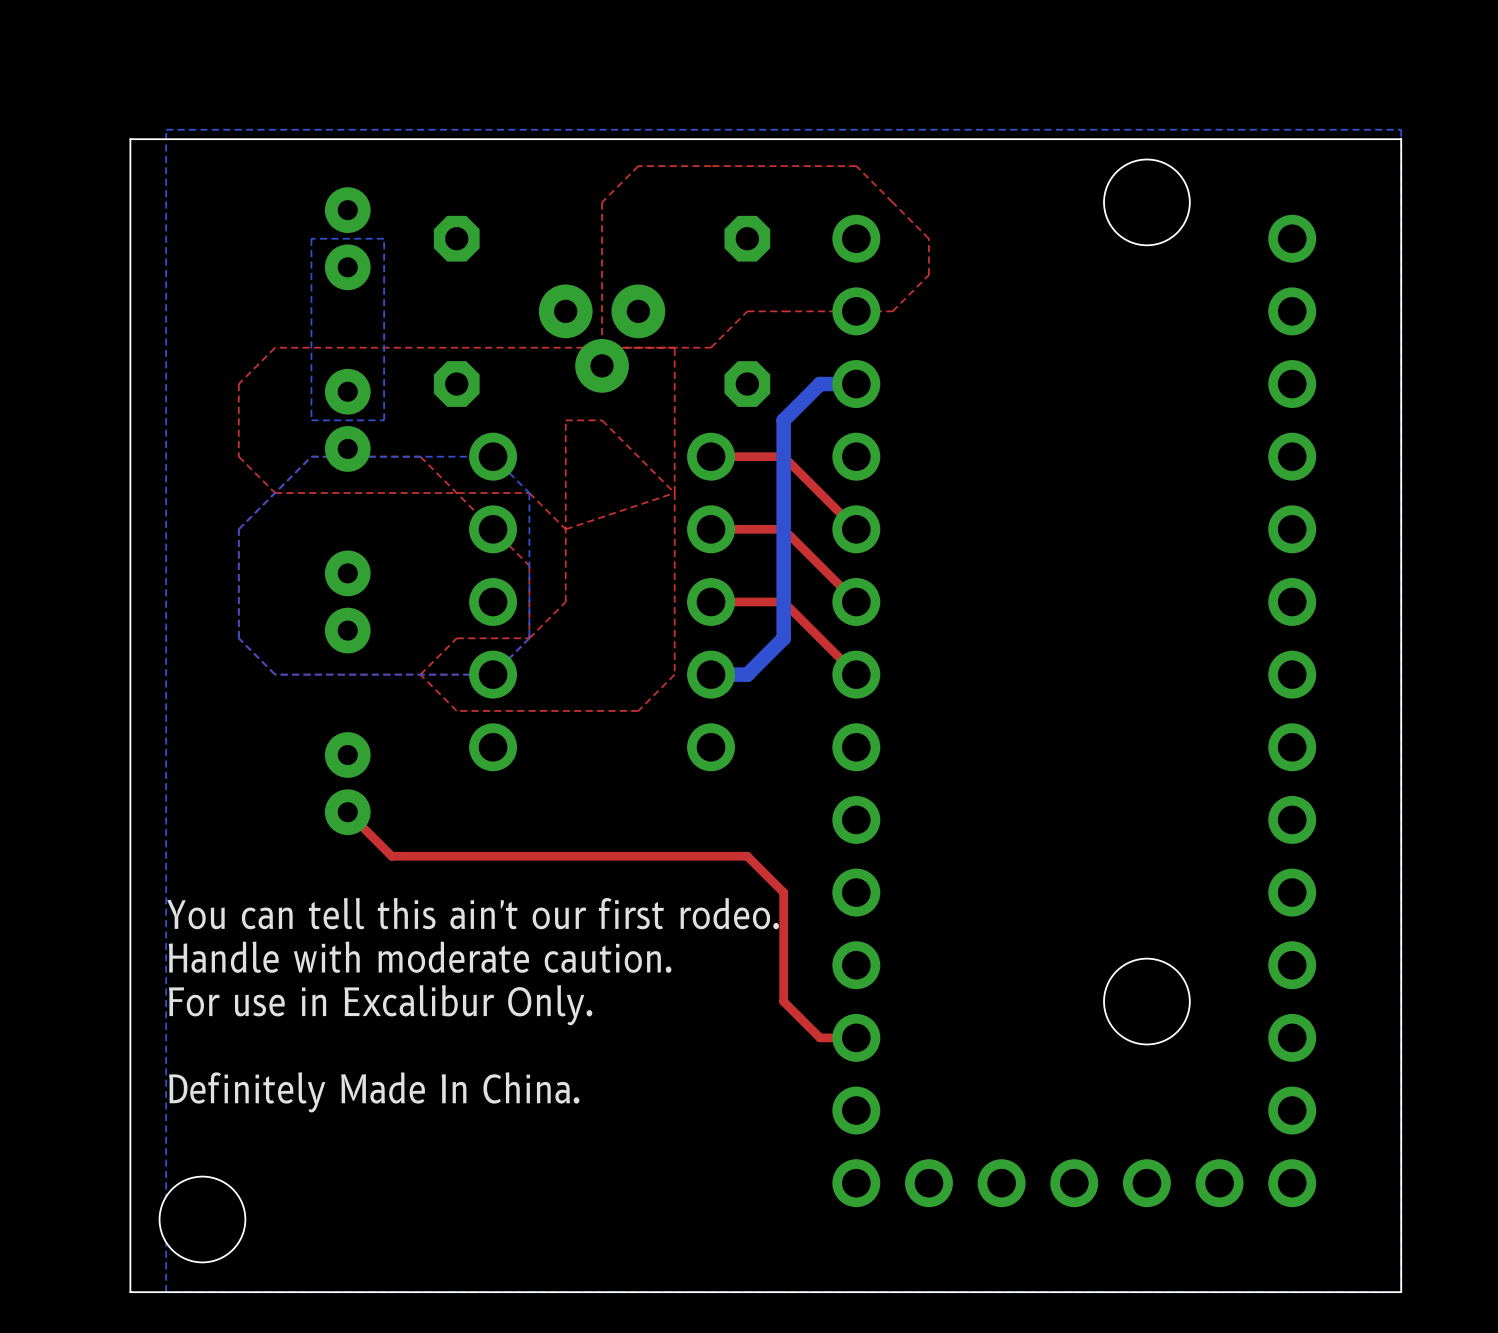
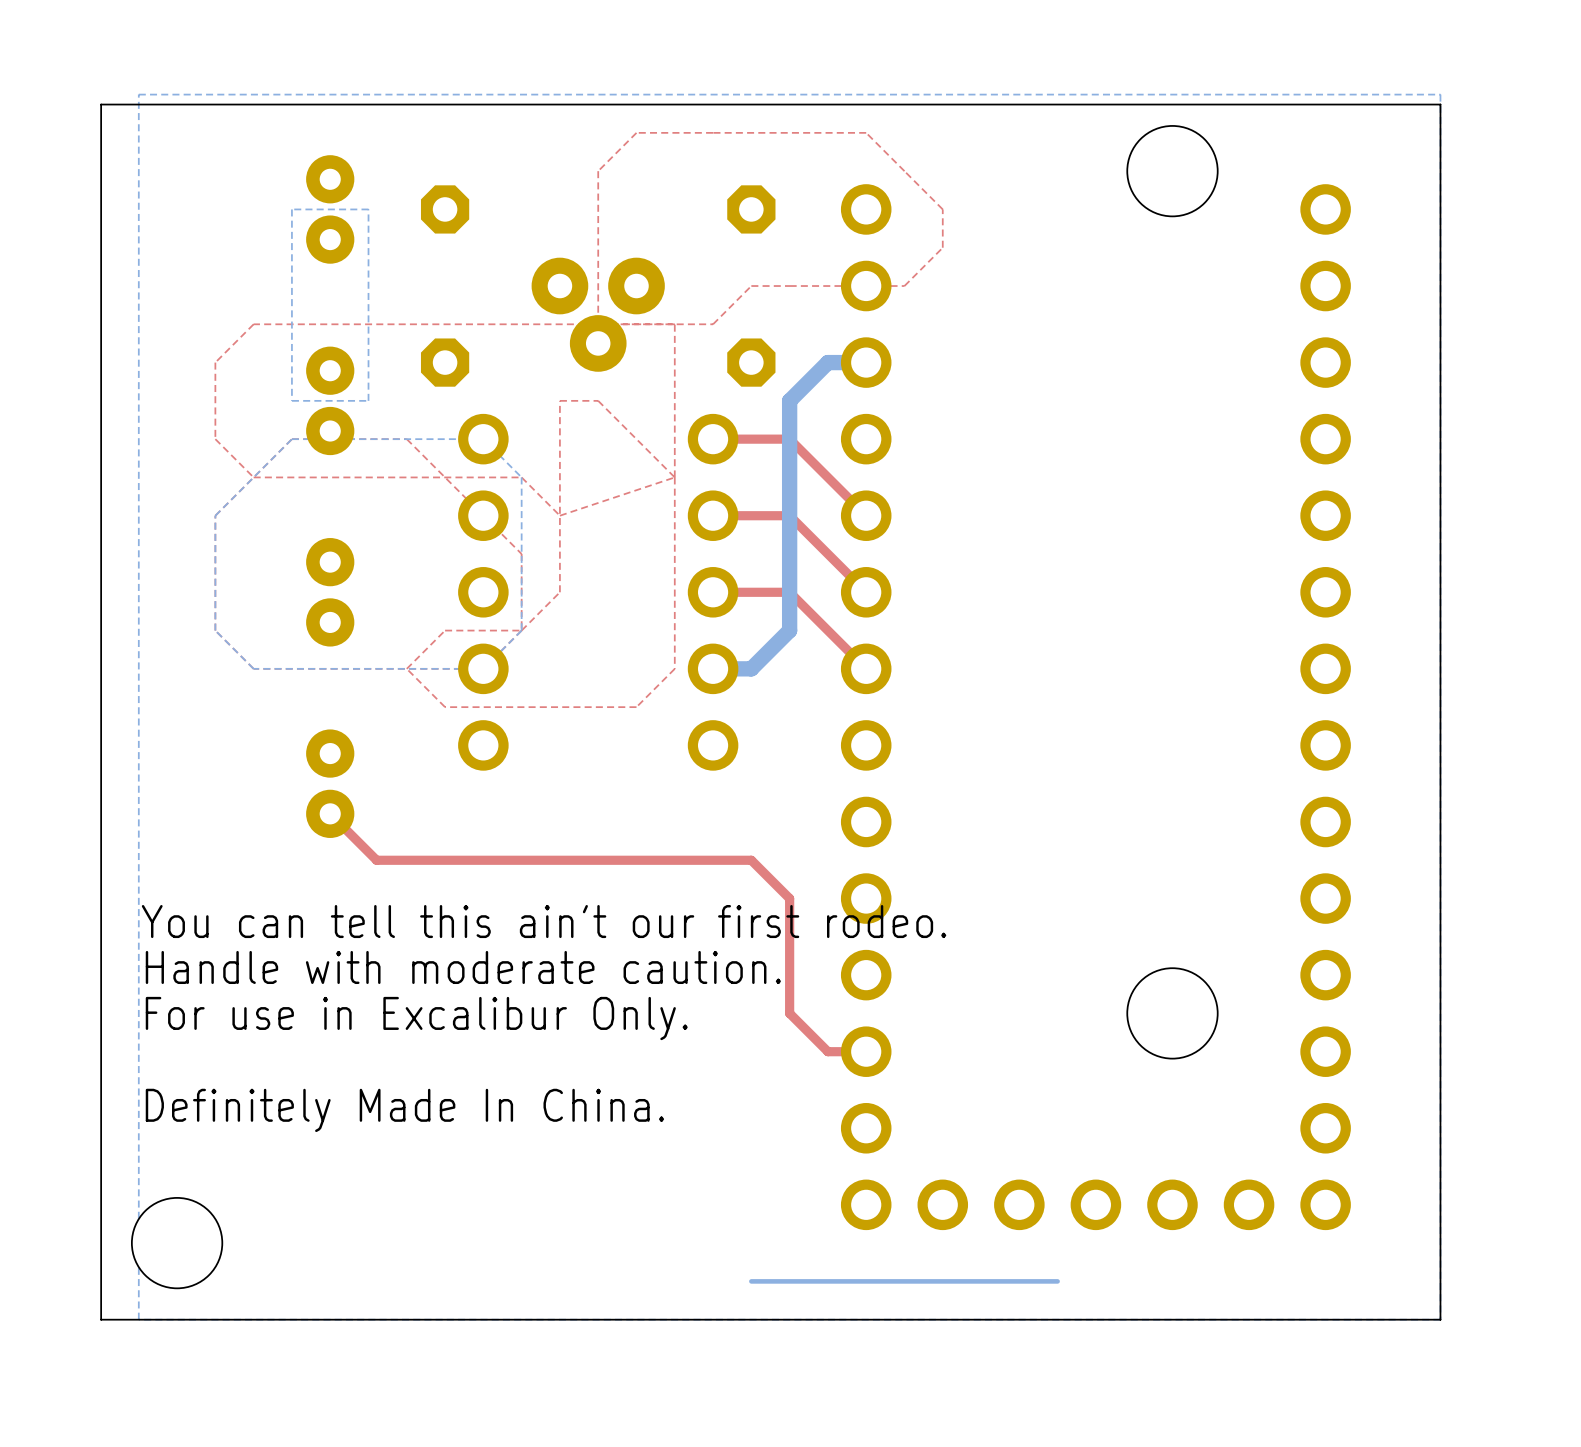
bottom track: none -> (1057, 1281) (751, 1281)

